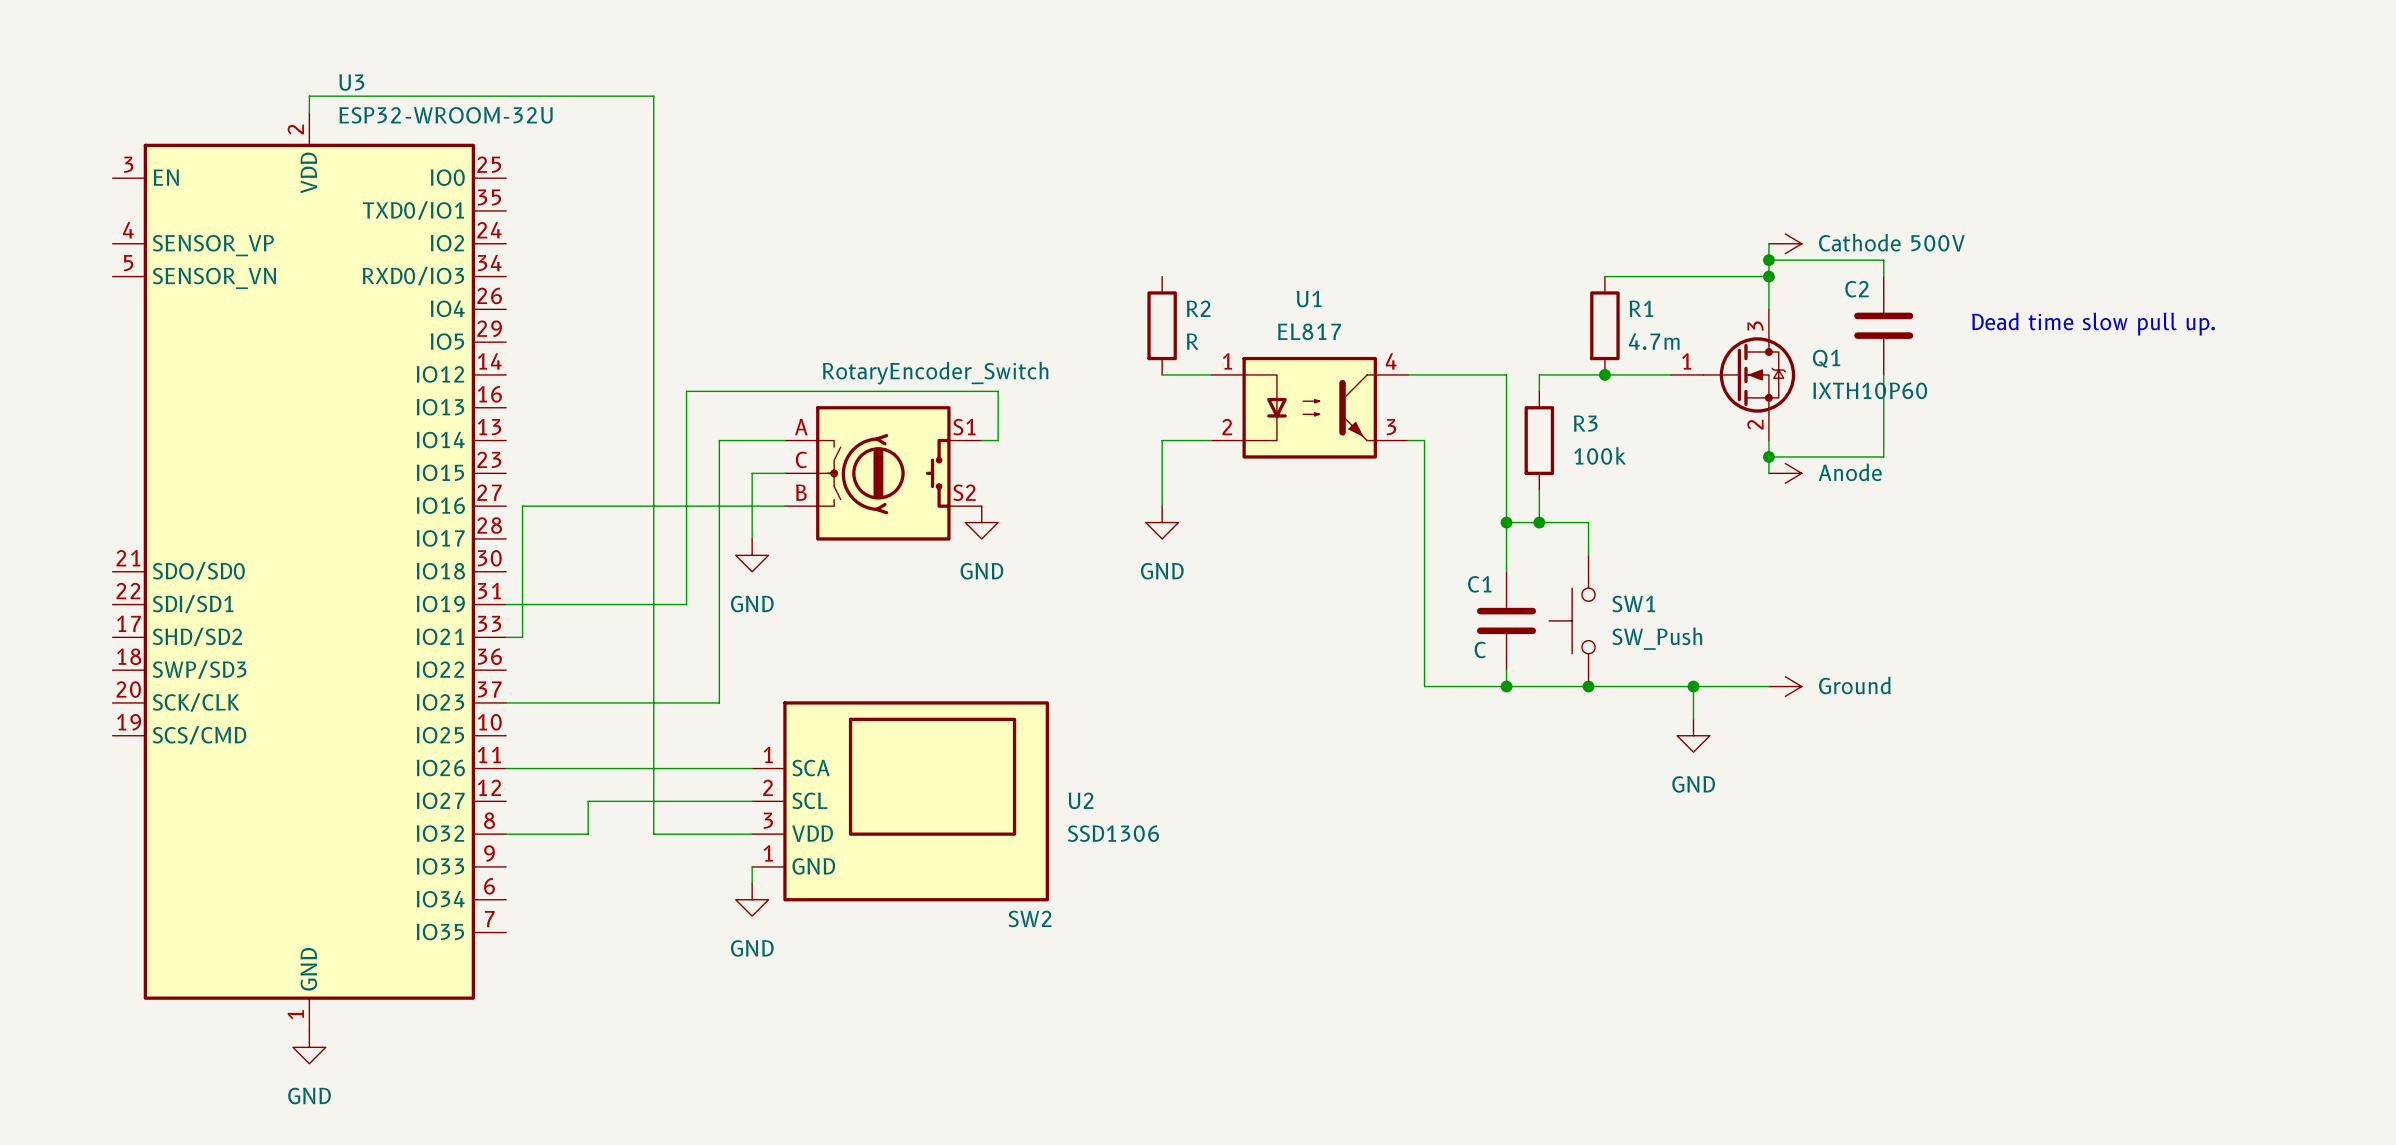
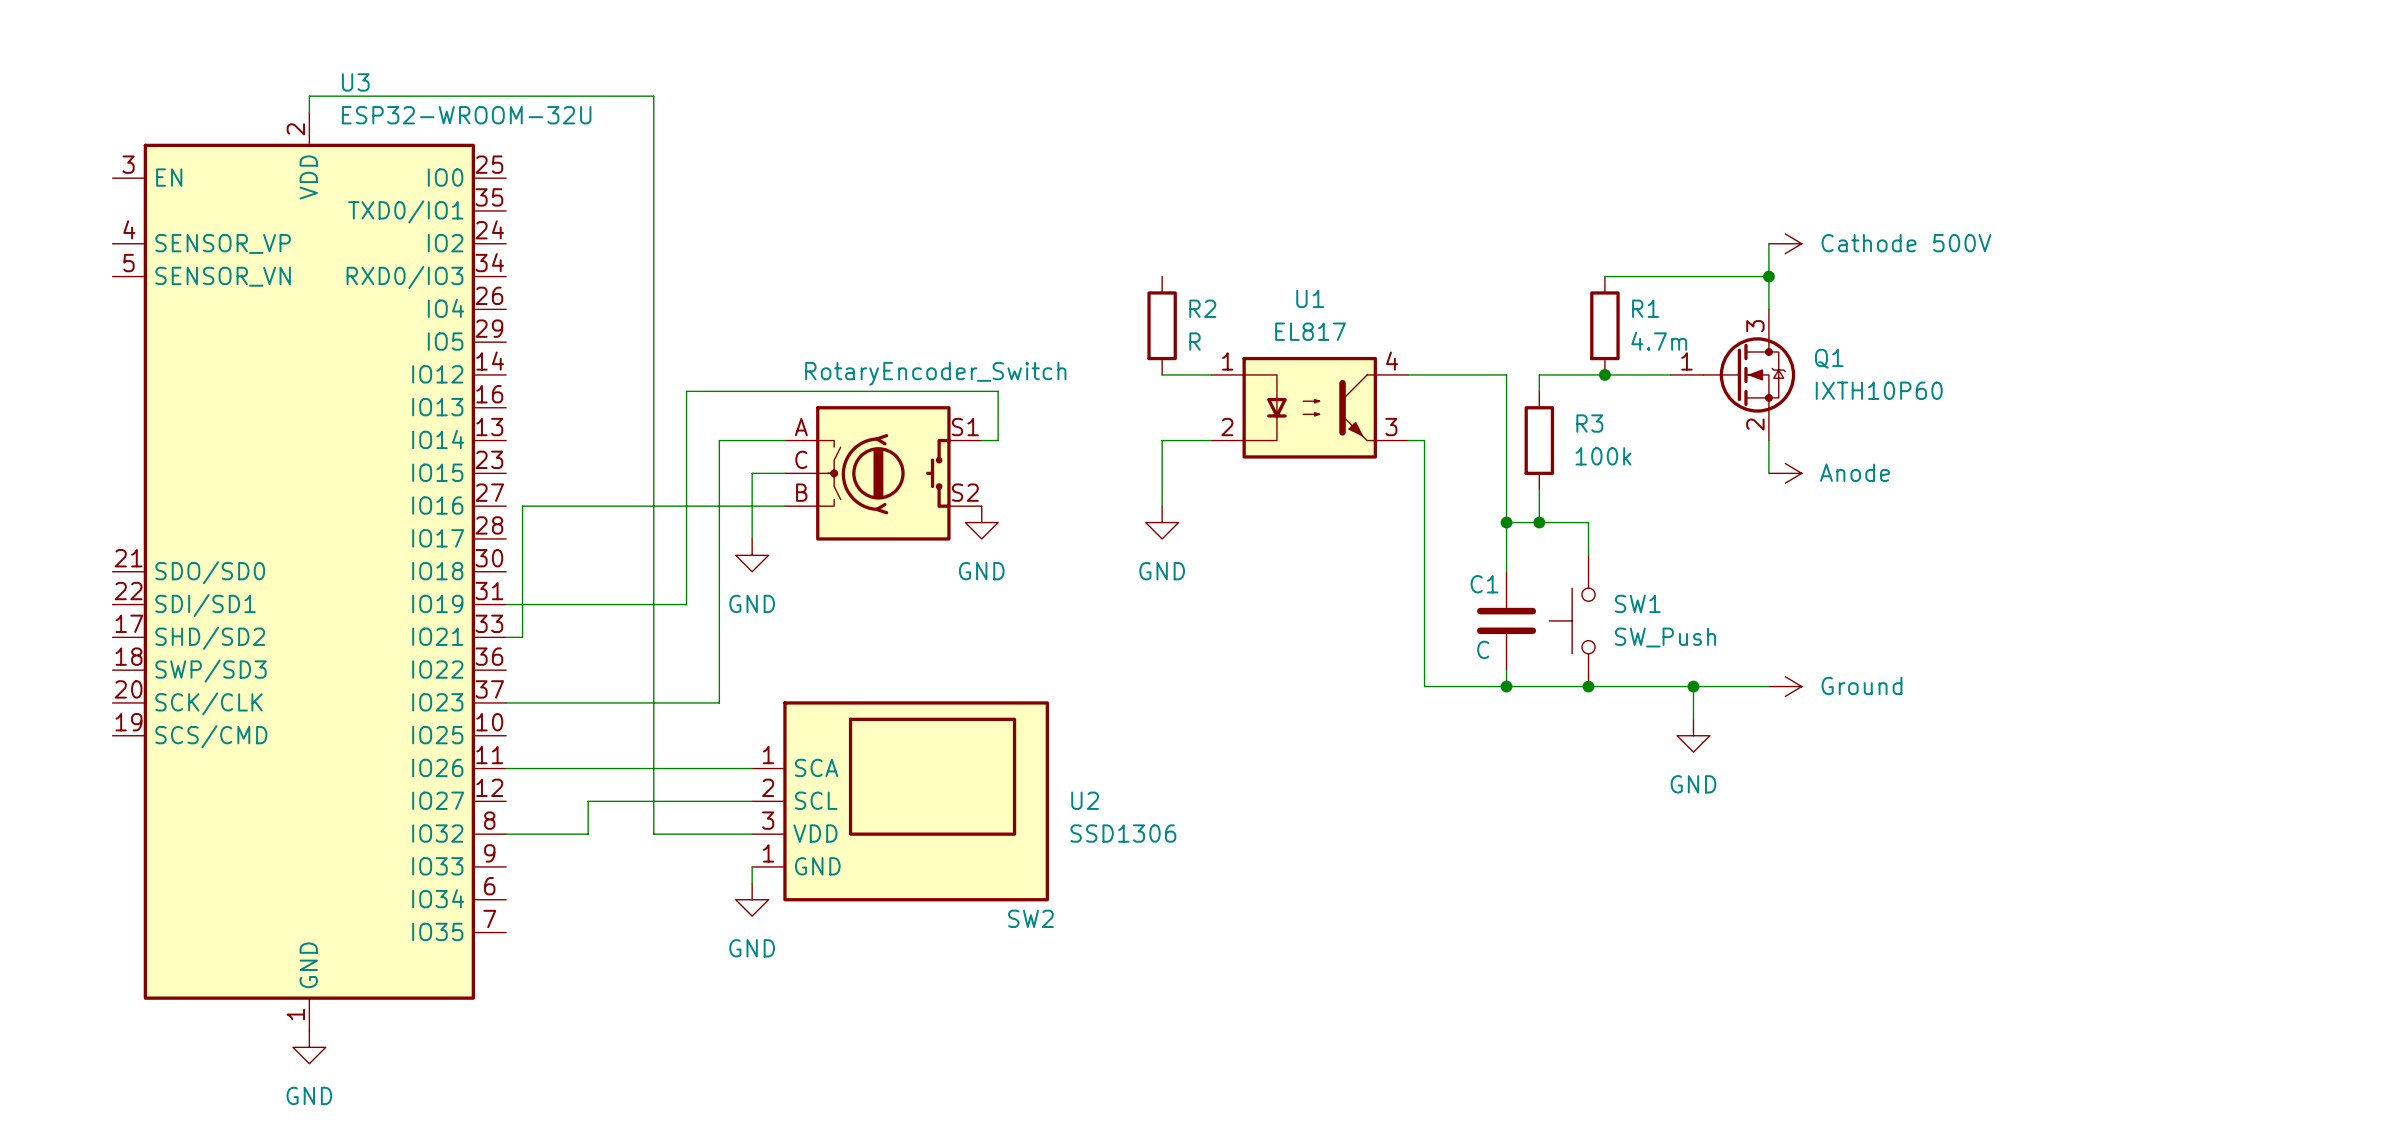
wire: (1768, 260) (1883, 260) (1883, 276) -> none
junction: (1768, 260) -> none
text: Dead time slow pull up. (2093, 324) -> none
C2: (1883, 325) -> none
wire: (1883, 374) (1883, 456) (1768, 456) -> none
junction: (1768, 456) -> none

